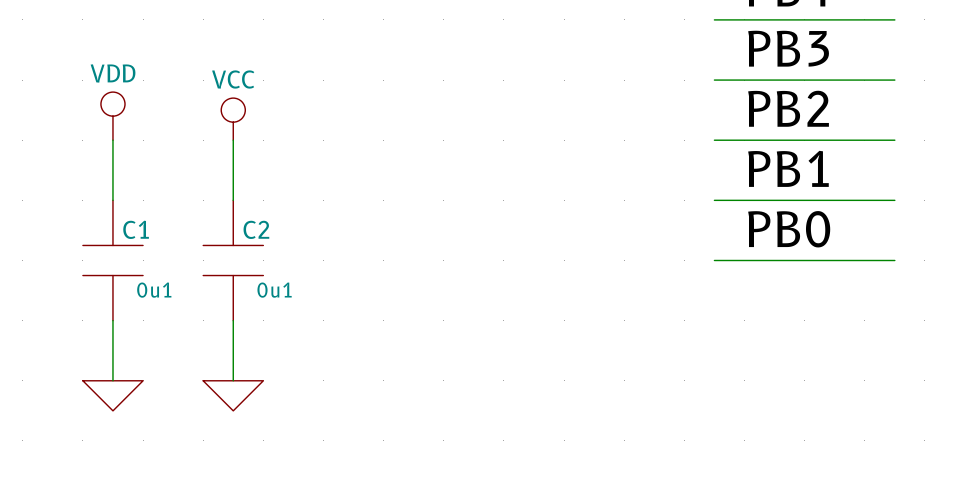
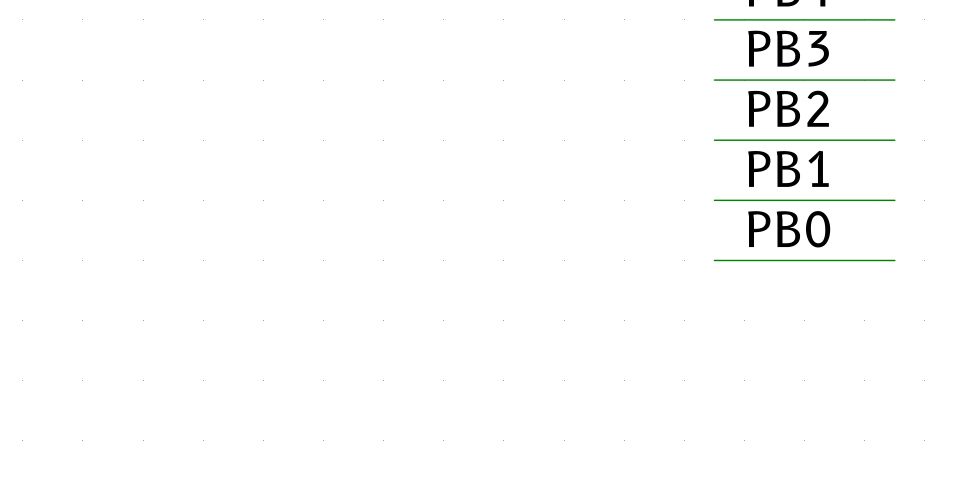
power symbol: VDD (112, 116) -> none
power symbol: VCC (233, 119) -> none
wire: (112, 140) (112, 200) -> none
wire: (233, 140) (233, 200) -> none
C1: 0u1 (112, 260) -> none
C2: 0u1 (233, 260) -> none
wire: (112, 320) (112, 380) -> none
wire: (233, 320) (233, 380) -> none
power symbol: (112, 395) -> none
power symbol: (233, 395) -> none

